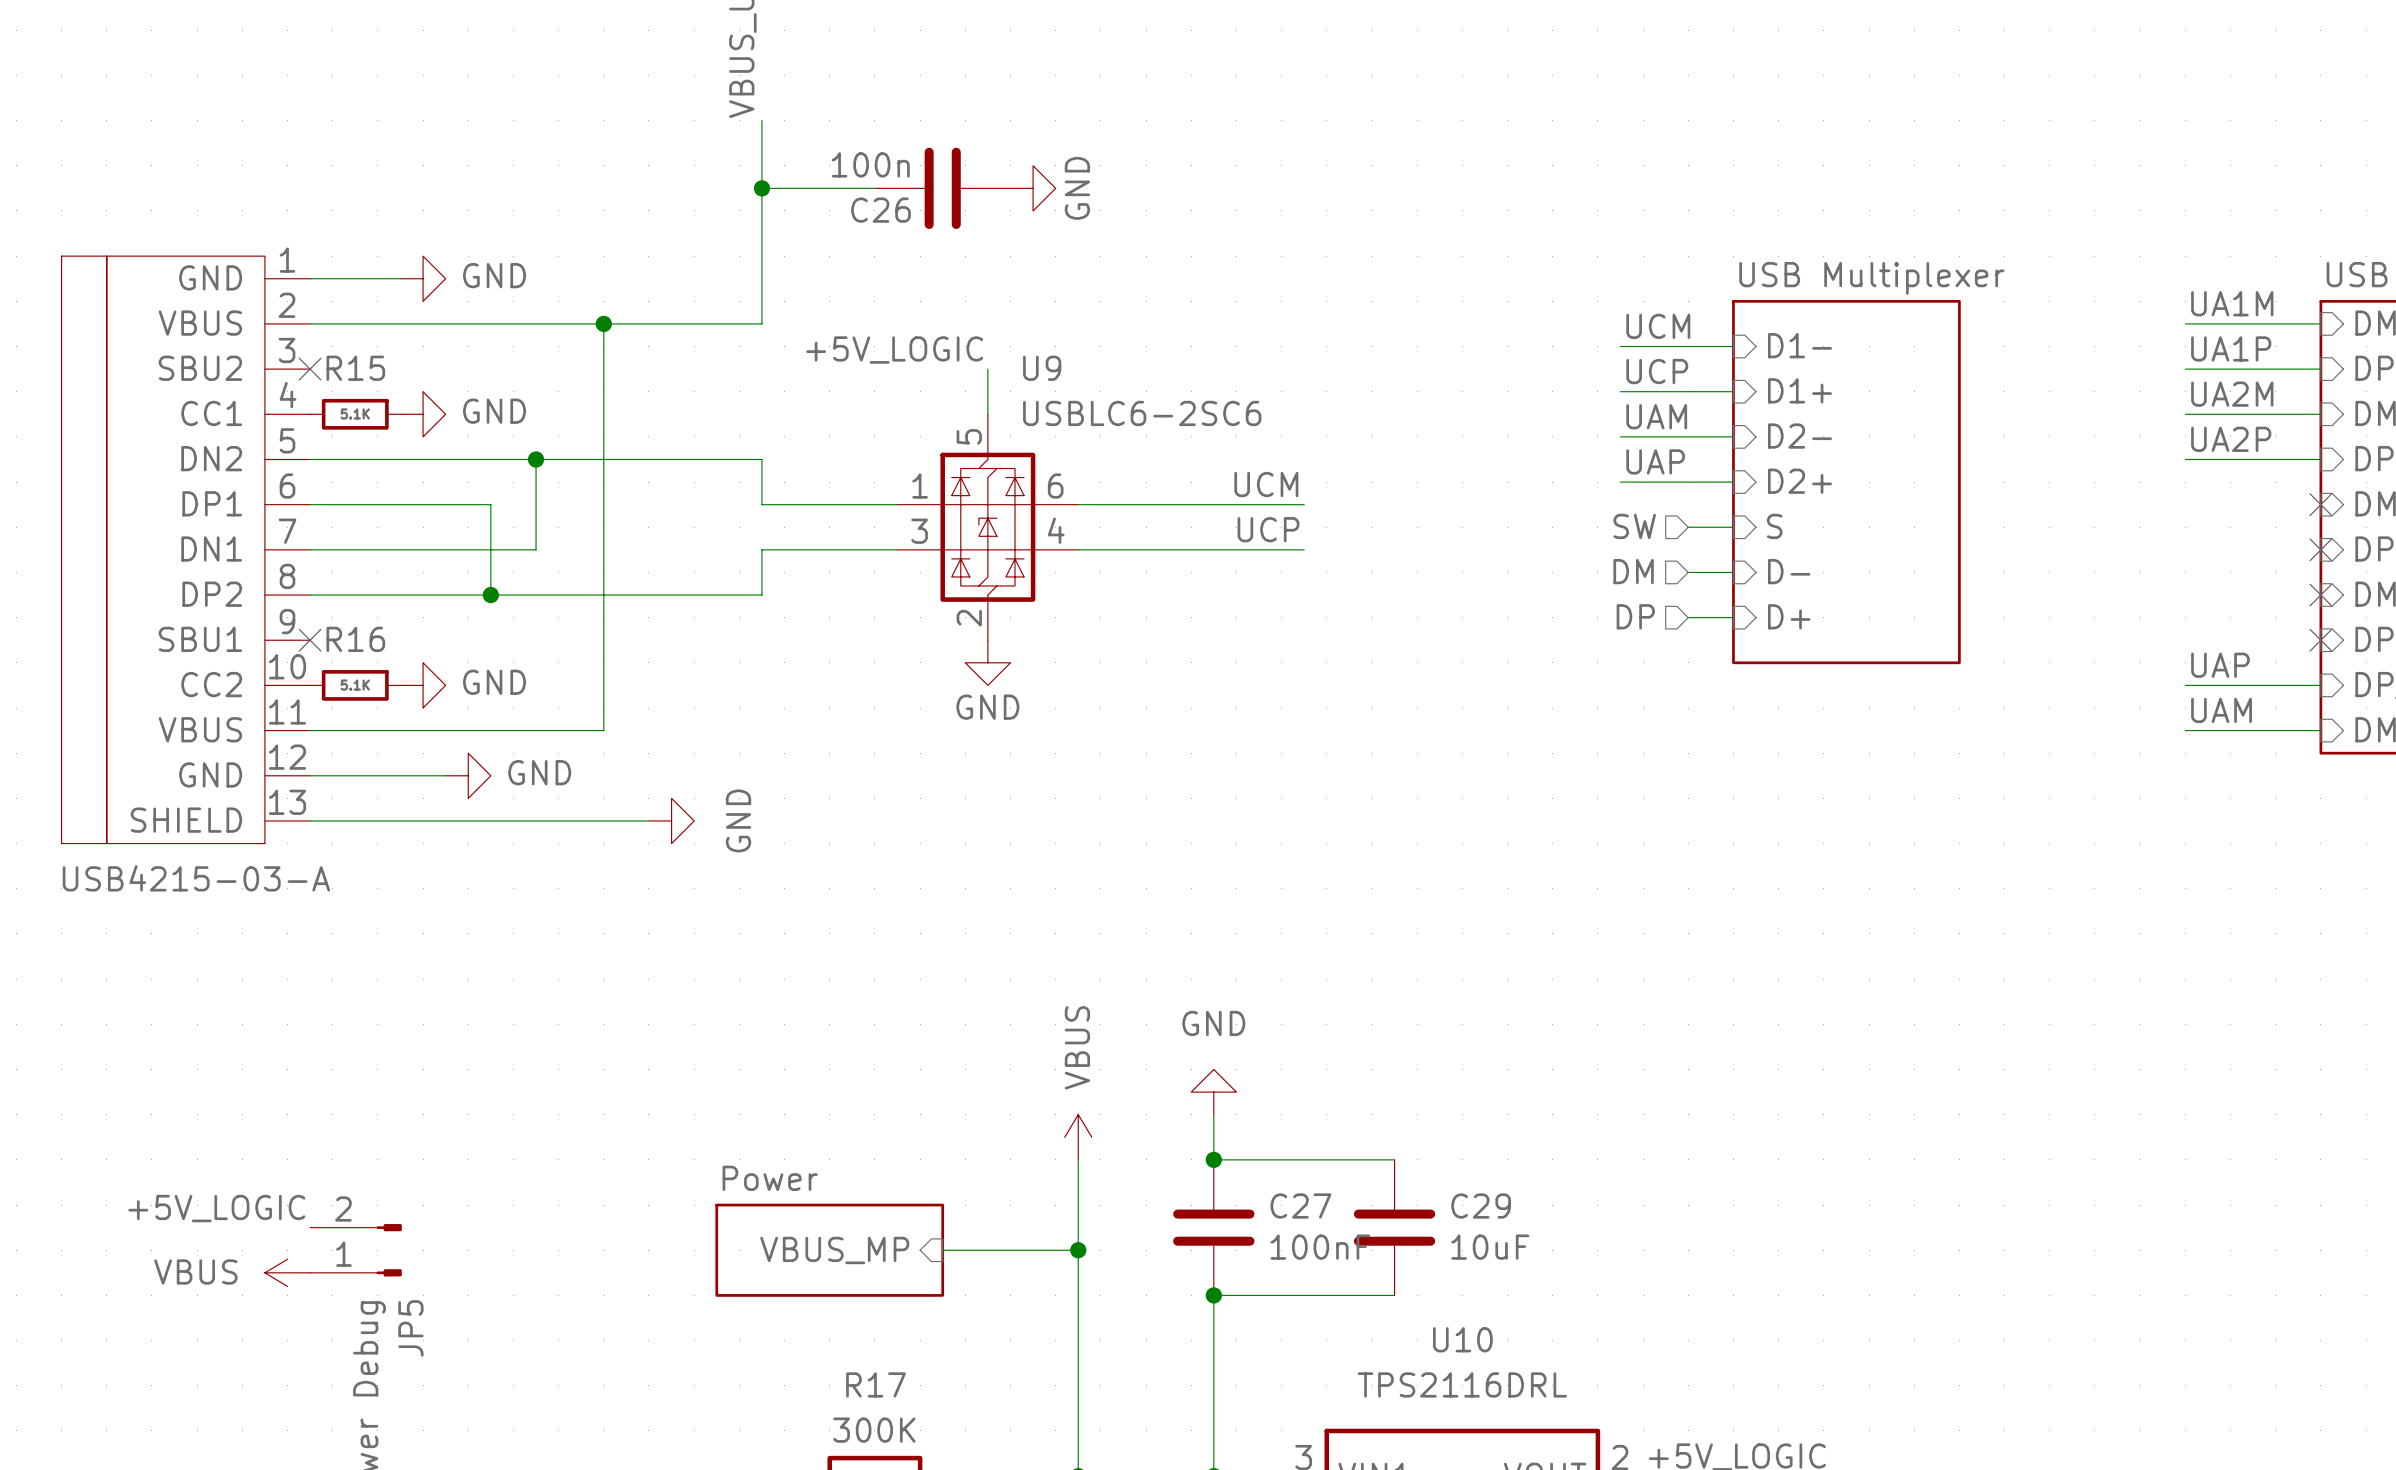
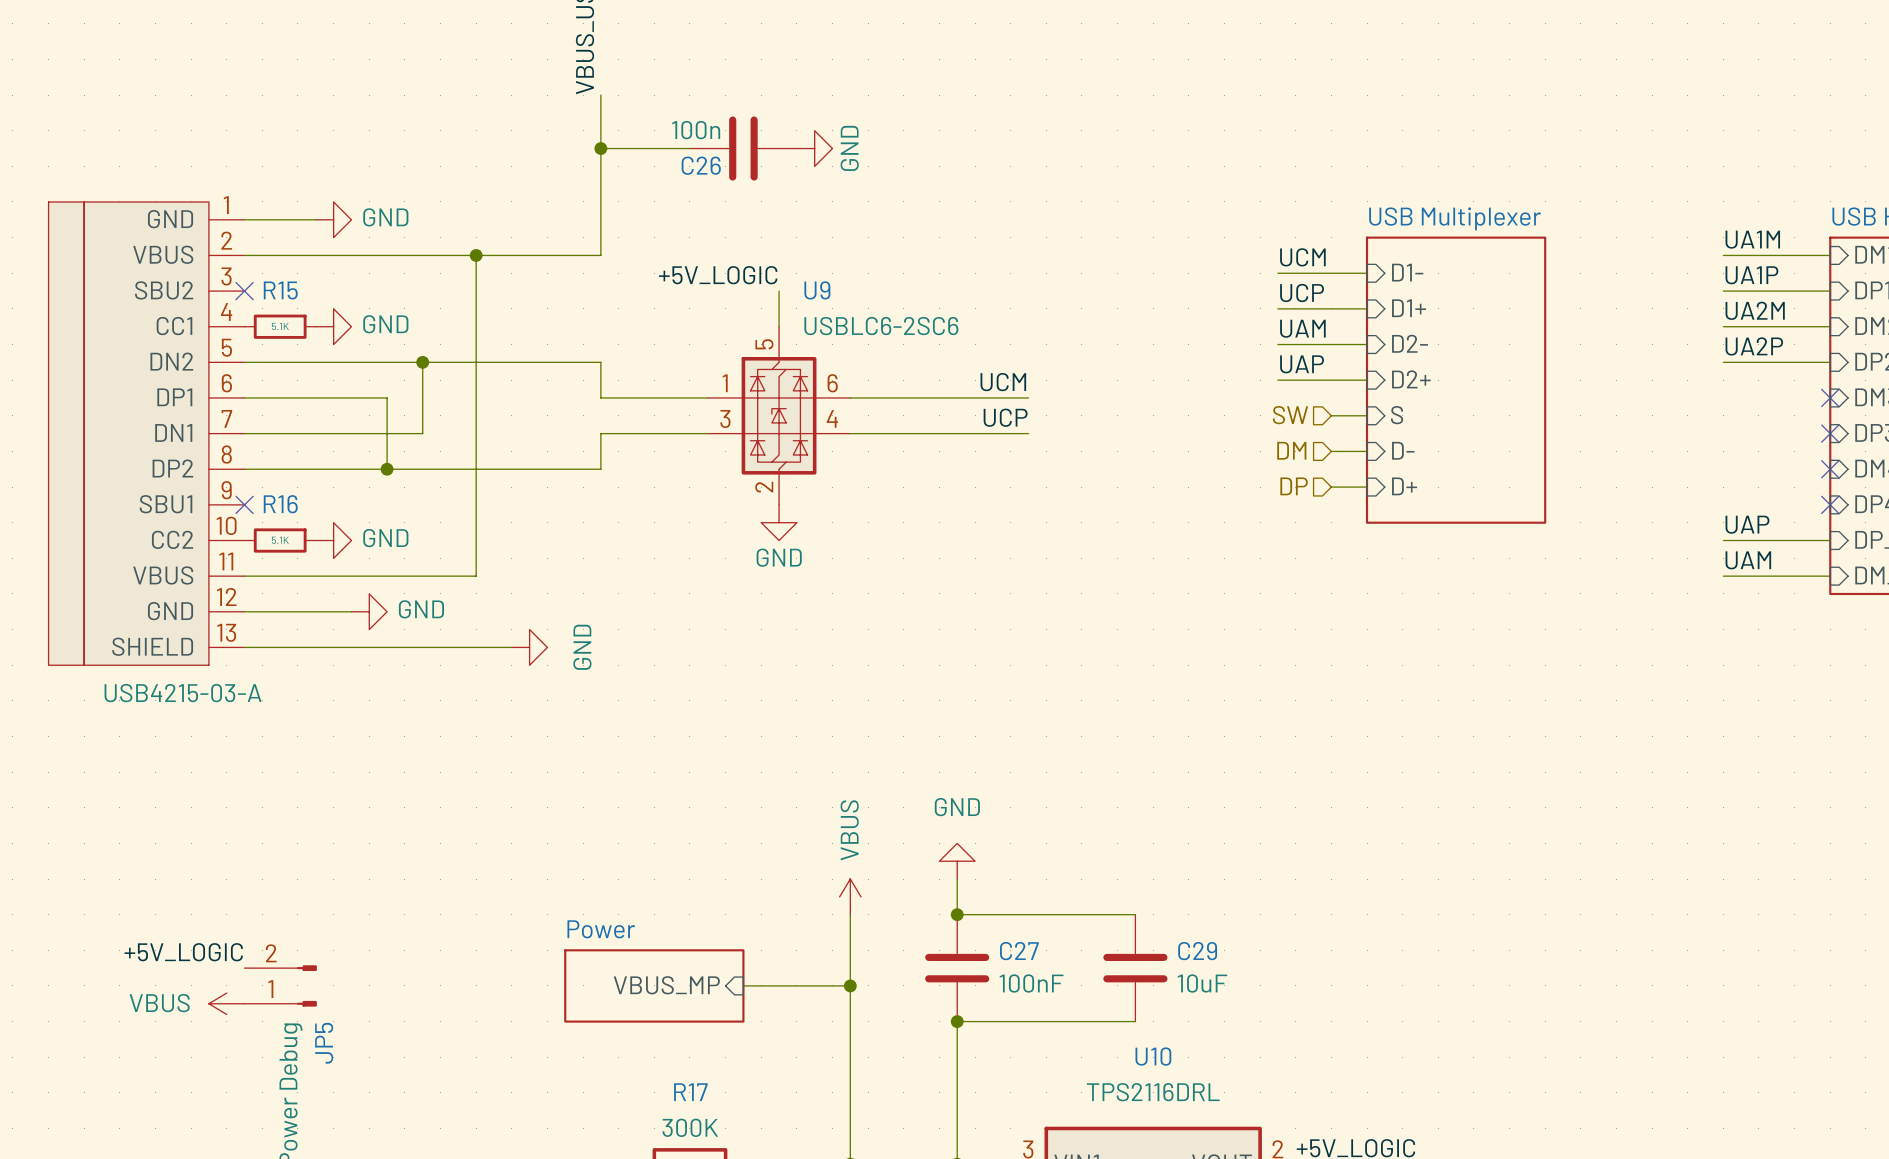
wire: none -> (1099, 914) (1135, 914)
C29 position: (1394, 1227) -> (1135, 968)
wire: none -> (1099, 1021) (1135, 1021)

